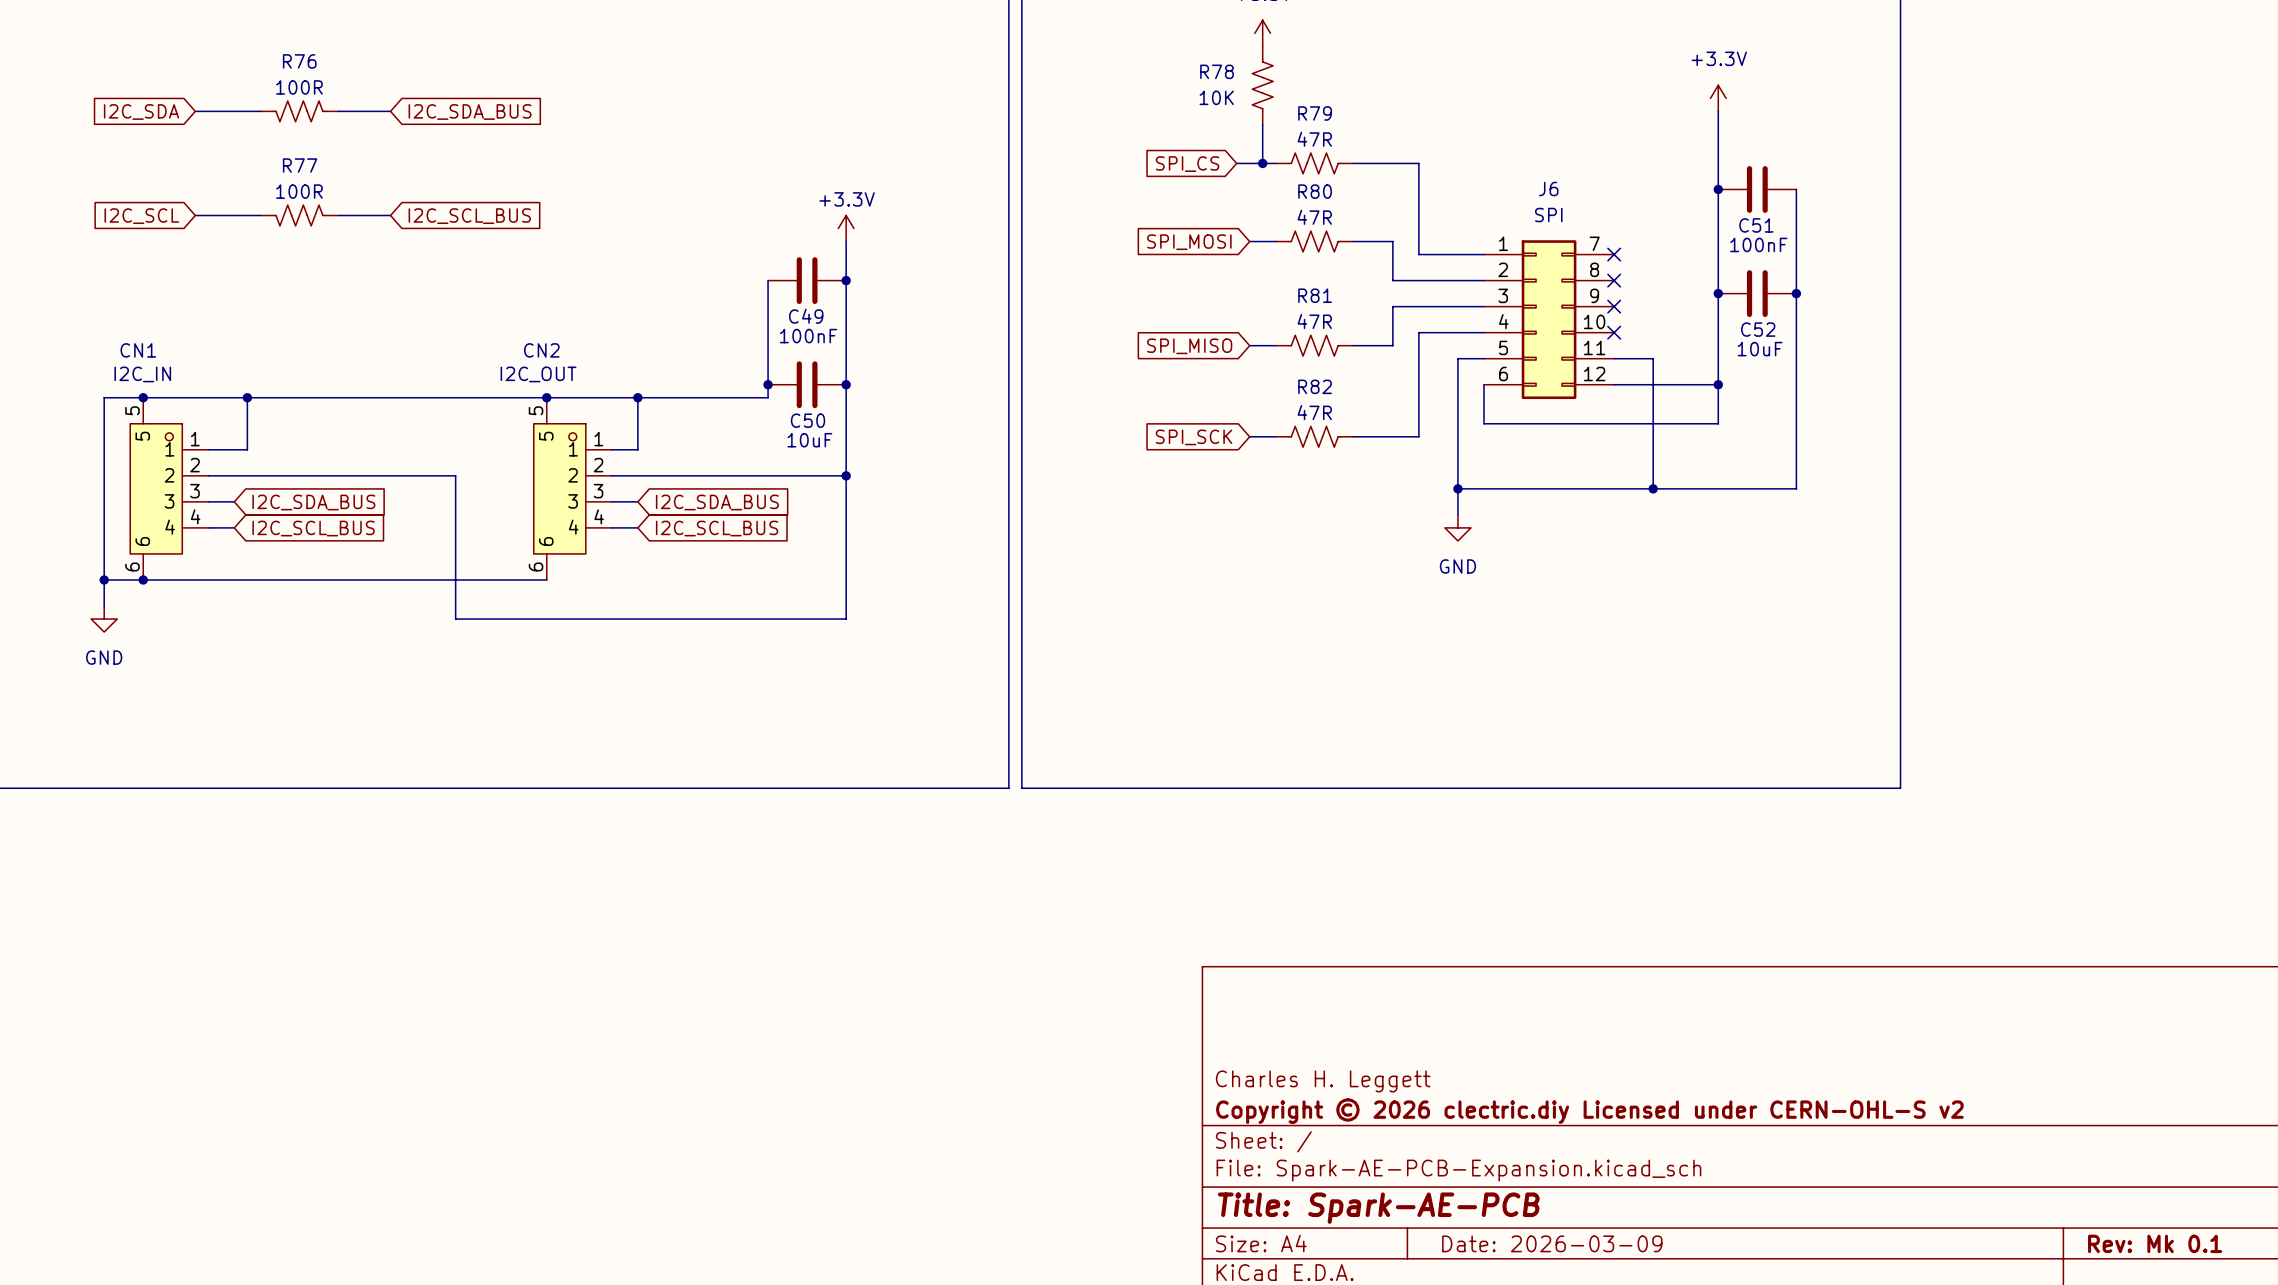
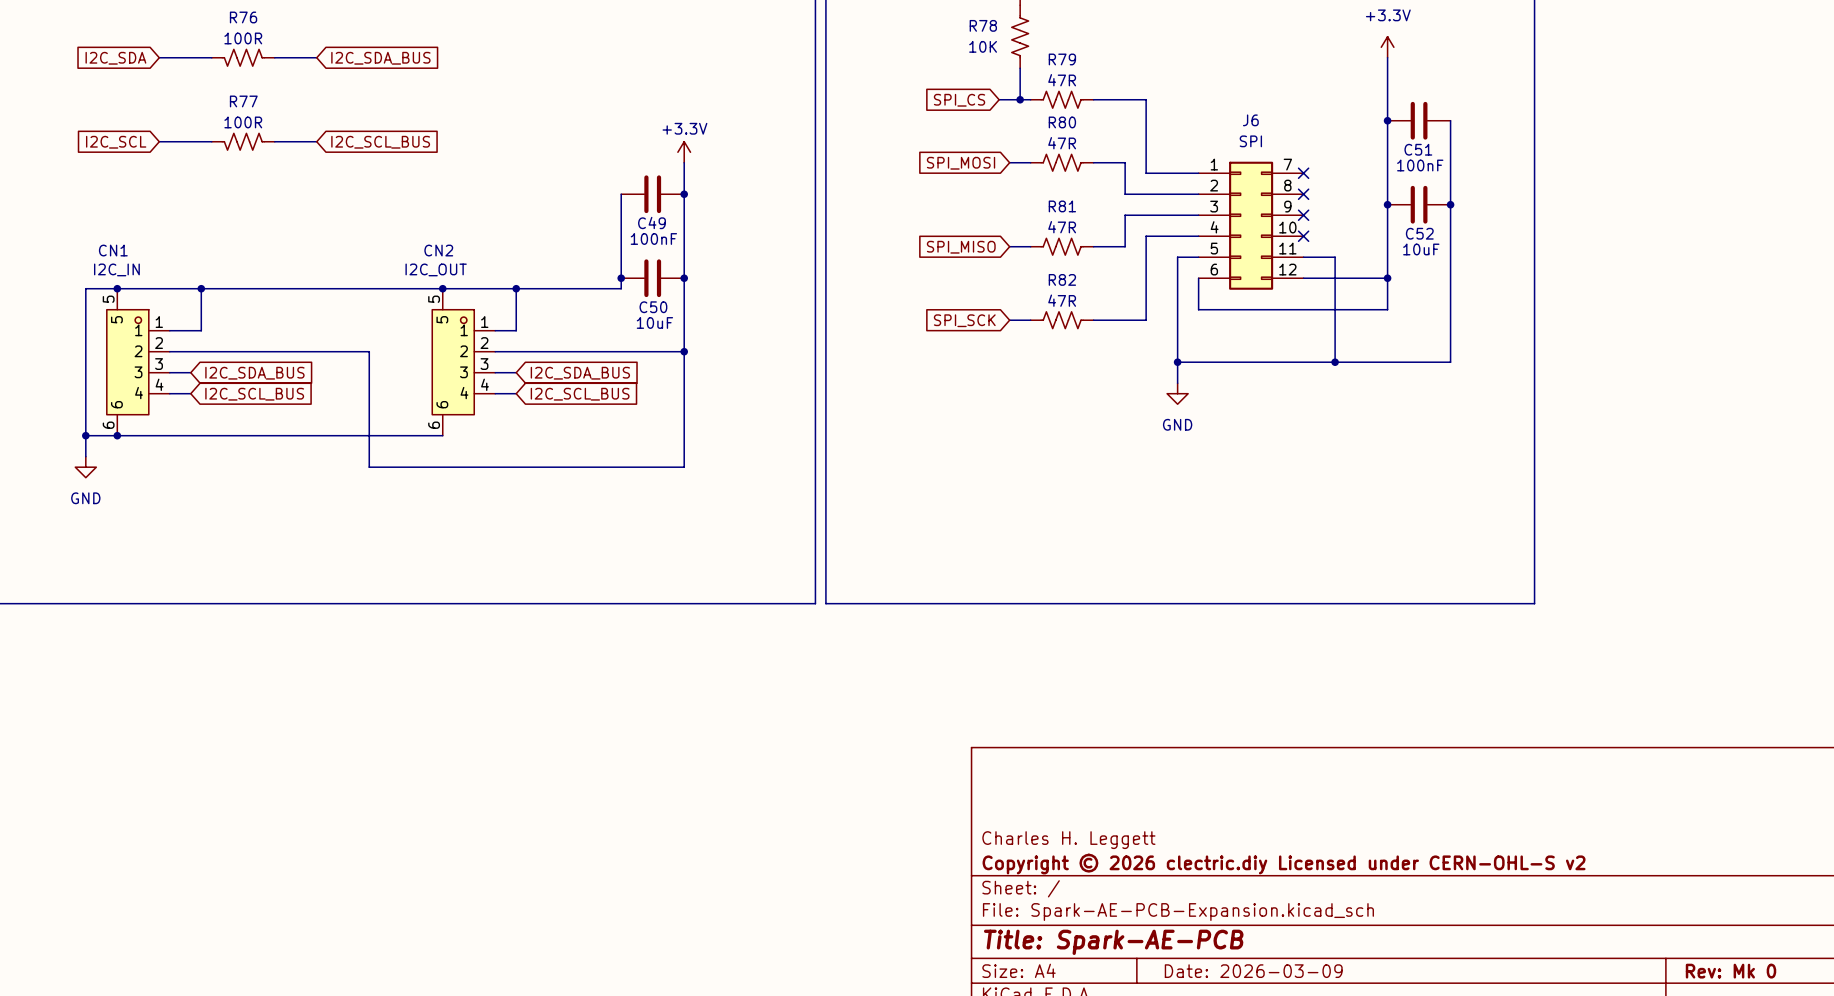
title block: Rev: Mk 0.1 (2155, 1243) -> Rev: Mk 0 (1731, 971)

